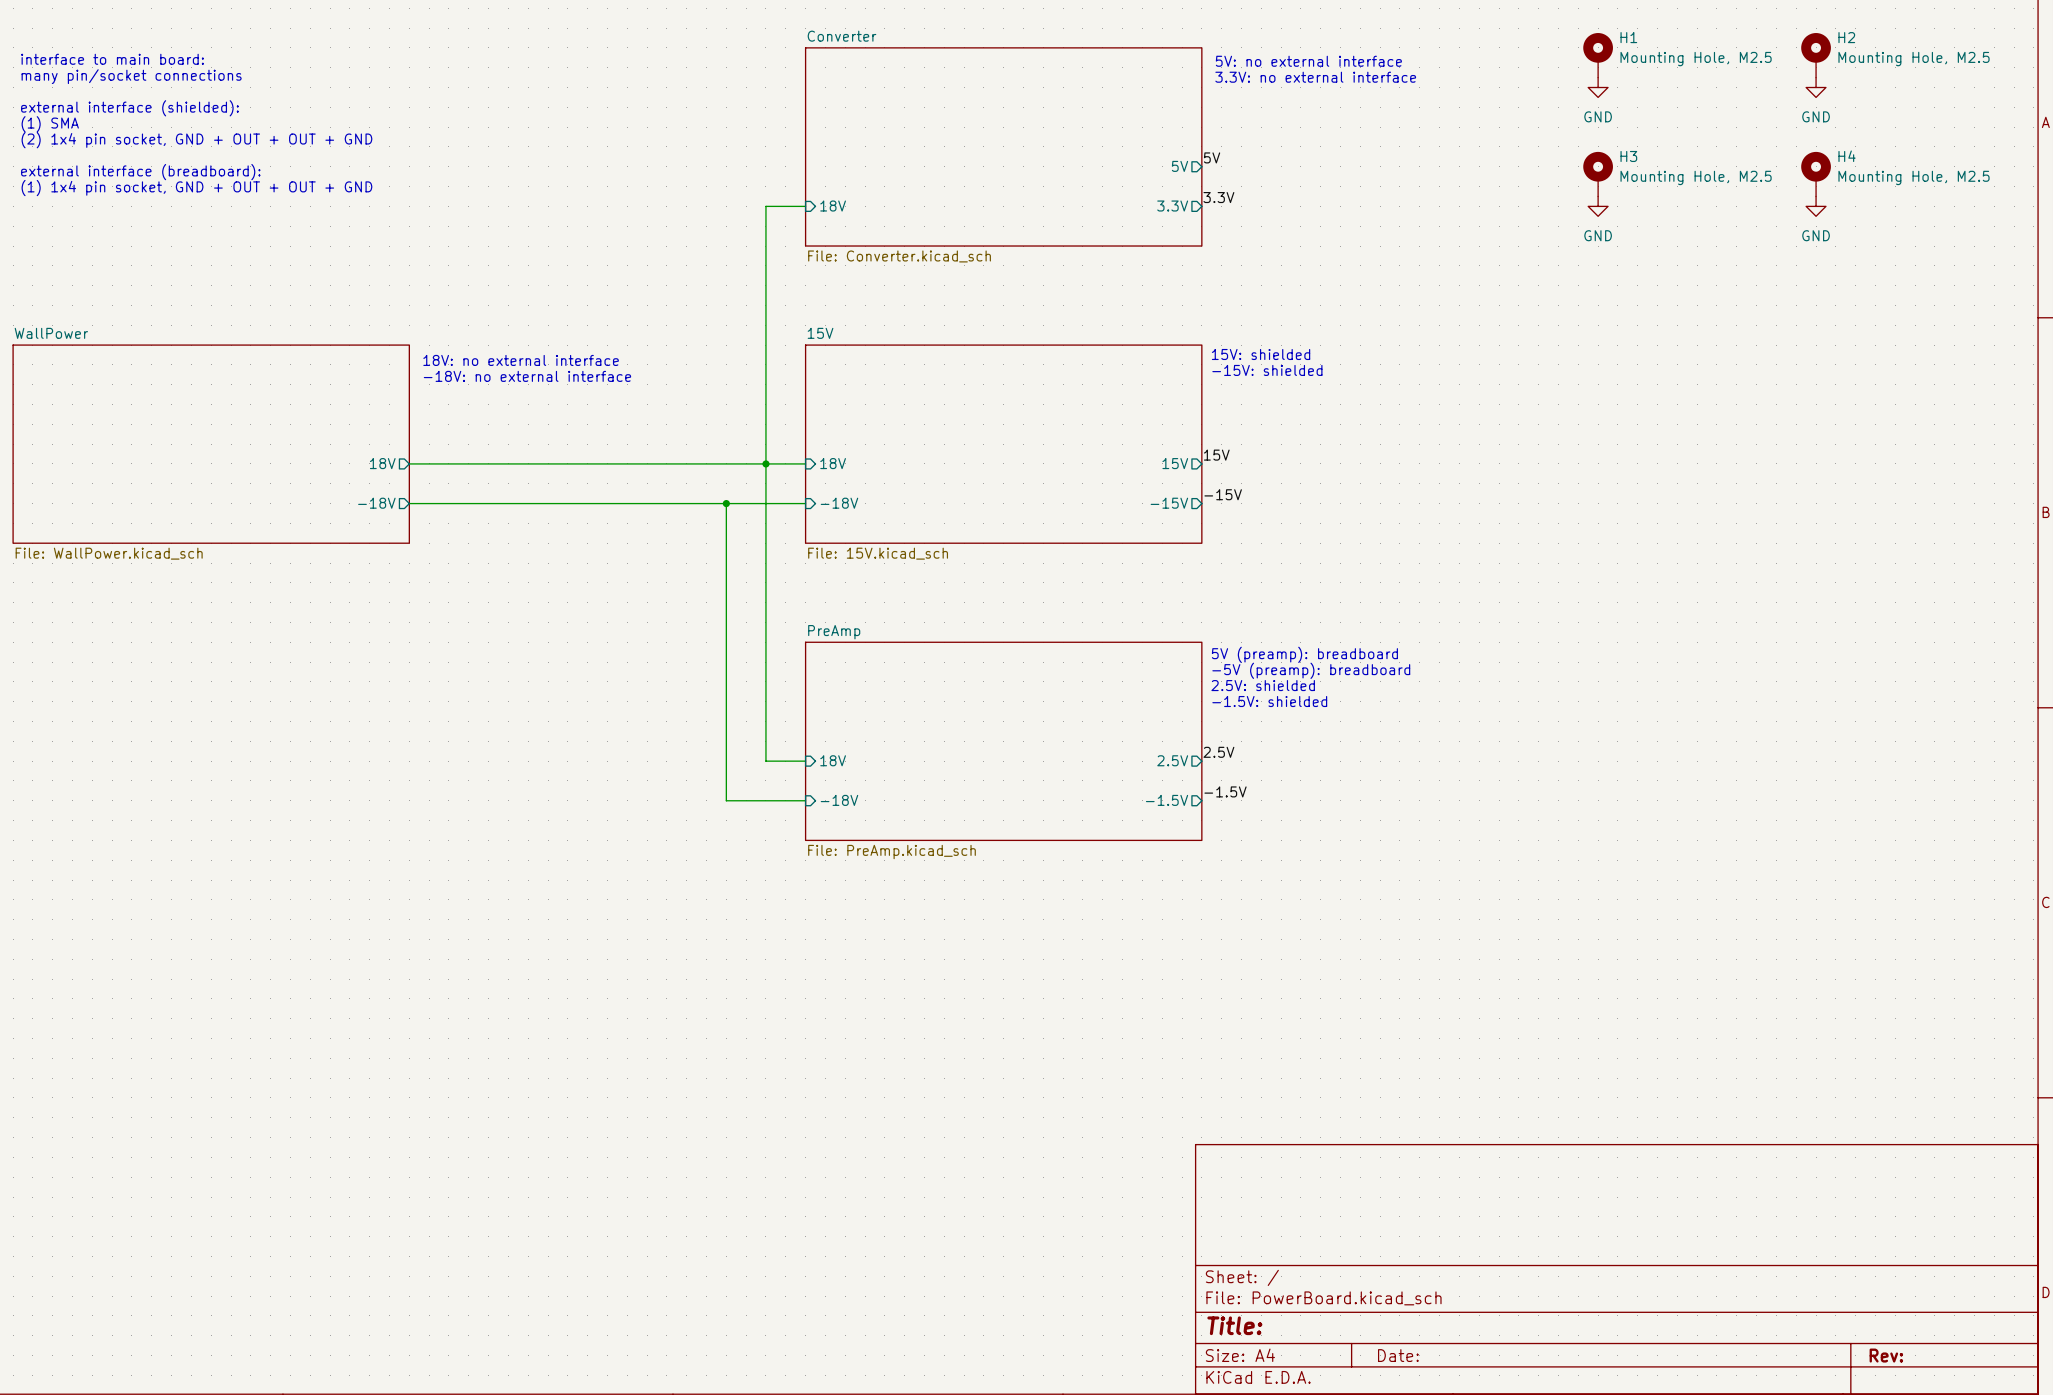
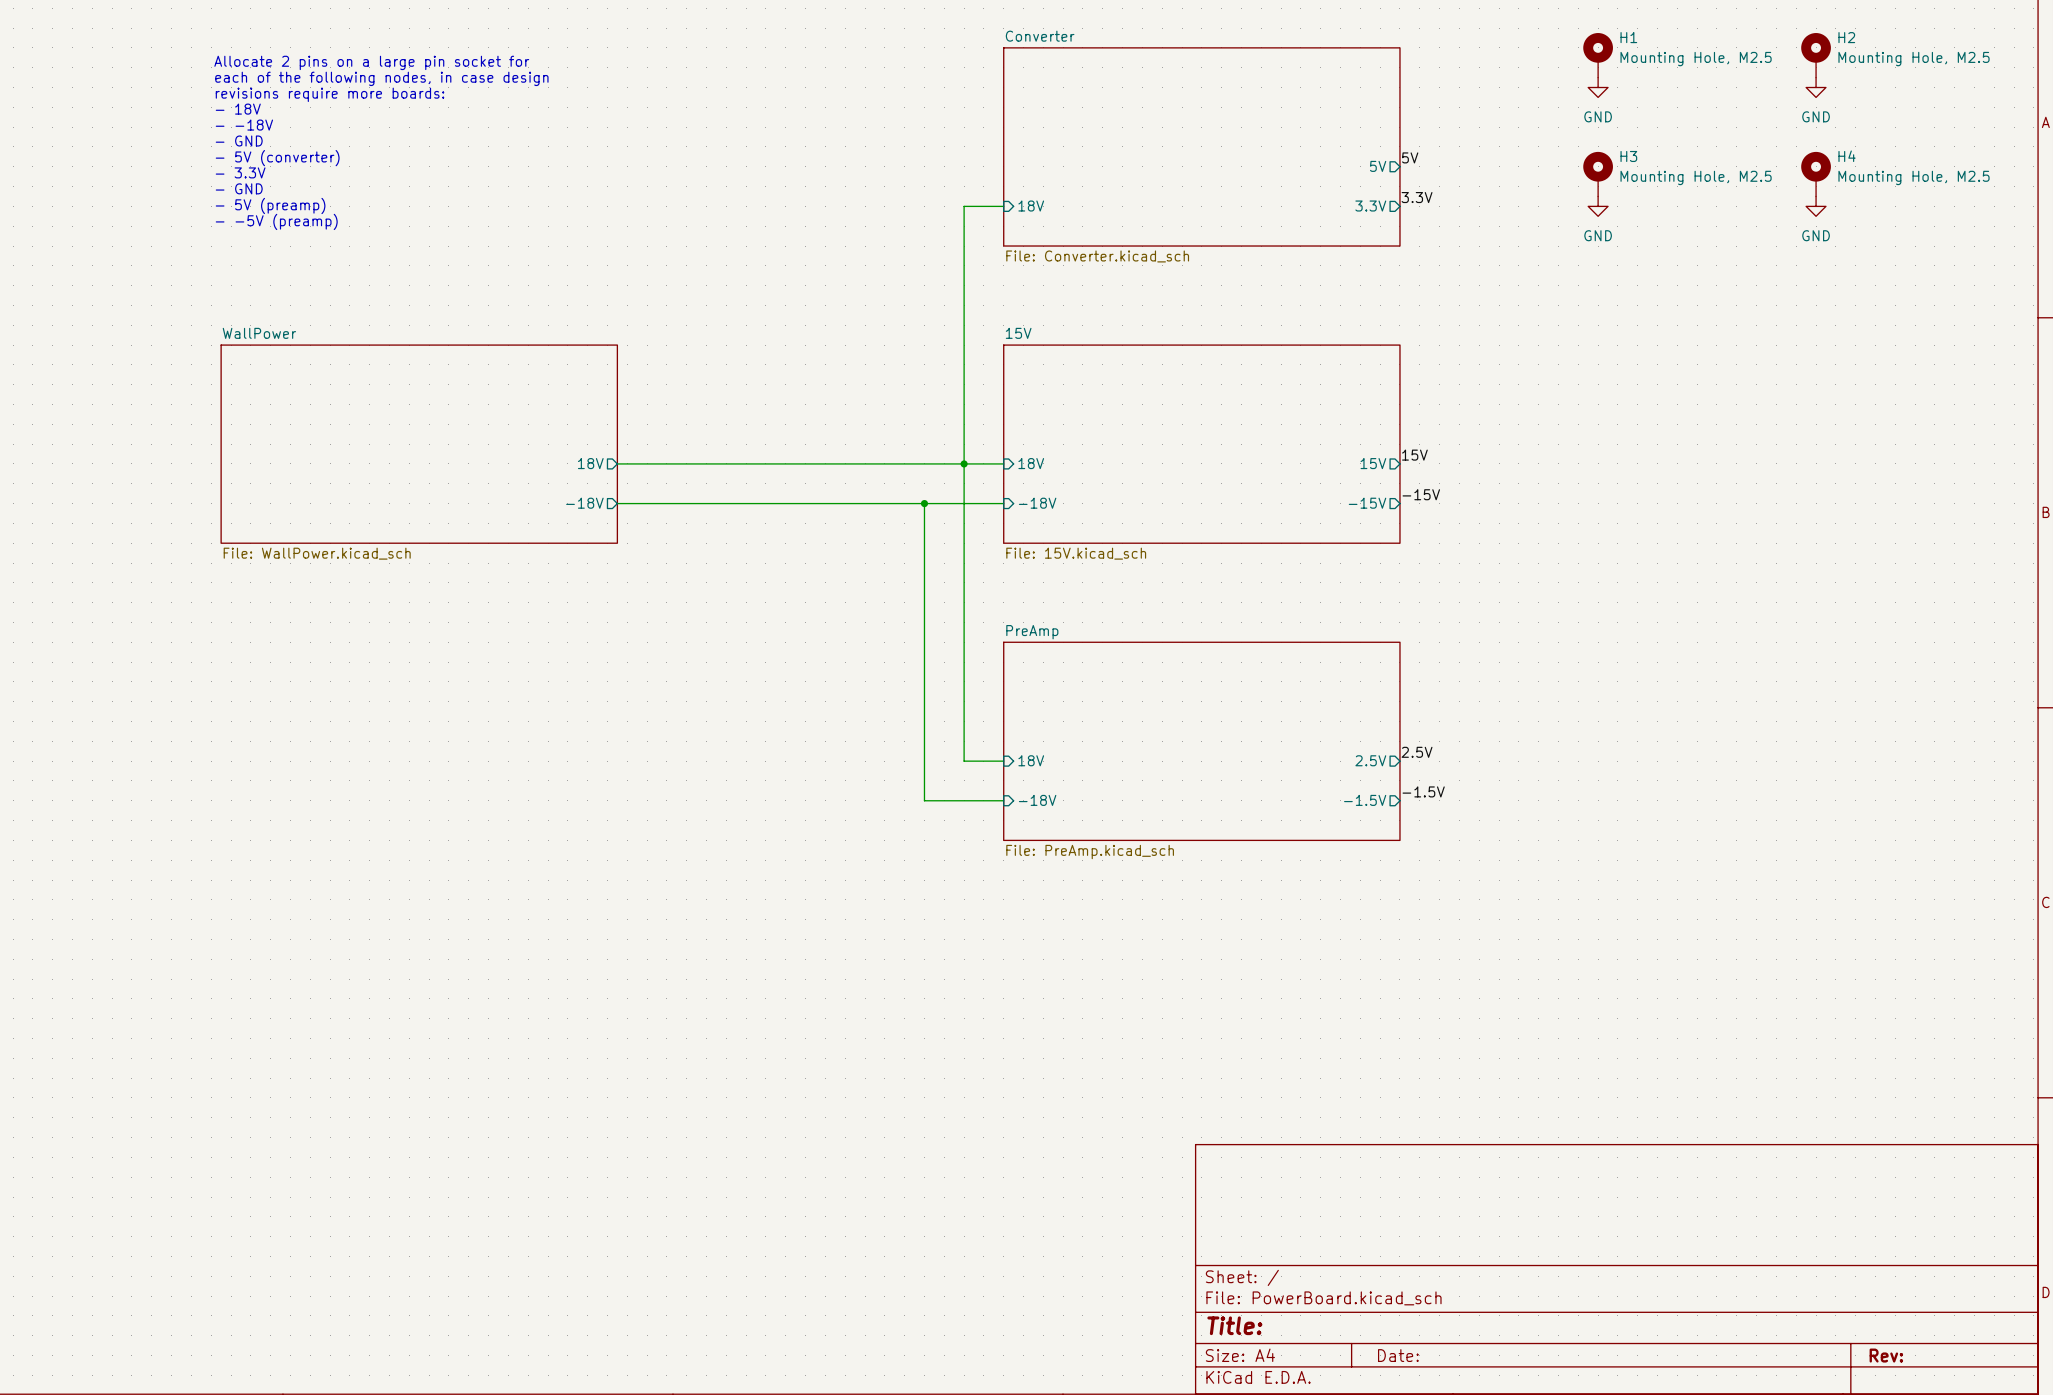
text: interface to main board: (112, 59) -> none
text: 5V: no external interface (1308, 61) -> none
text: none -> Allocate 2 pins on a large pin socket for (371, 62)
text: many pin/socket connections (131, 76) -> none
text: 3.3V: no external interface (1315, 77) -> none
text: none -> each of the following nodes, in case design (381, 78)
text: none -> revisions require more boards: (330, 94)
text: external interface (shielded): (129, 108) -> none
text: none -> - 18V (238, 109)
text: (1) SMA (50, 124) -> none
text: none -> - -18V (244, 125)
text: (2) 1x4 pin socket, GND + OUT + OUT + GND (196, 140) -> none
text: none -> - GND (239, 141)
sheet Converter: File: Converter.kicad_sch (1003, 146) -> none
sheet Converter: none -> File: Converter.kicad_sch (1201, 146)
label: 5V (1212, 157) -> none
label: none -> 5V (1410, 157)
text: none -> - 5V (converter) (277, 158)
sheet pin: 5V (1179, 166) -> none
sheet pin: none -> 5V (1378, 166)
text: external interface (breadboard): (140, 172) -> none
text: none -> - 3.3V (240, 172)
text: (1) 1x4 pin socket, GND + OUT + OUT + GND (196, 188) -> none
text: none -> - GND (239, 188)
label: 3.3V (1218, 197) -> none
label: none -> 3.3V (1417, 197)
text: none -> - 5V (preamp) (270, 205)
wire: (805, 206) (765, 206) (765, 761) (805, 761) -> none
sheet pin: 18V (833, 206) -> none
wire: none -> (1003, 206) (964, 206) (964, 761) (1003, 761)
sheet pin: none -> 18V (1031, 206)
sheet pin: 3.3V (1172, 206) -> none
sheet pin: none -> 3.3V (1370, 206)
text: none -> - -5V (preamp) (276, 221)
text: 15V: shielded (1261, 354) -> none
text: 18V: no external interface (521, 360) -> none
text: -15V: shielded (1267, 370) -> none
text: -18V: no external interface (527, 376) -> none
sheet WallPower: File: WallPower.kicad_sch (211, 444) -> none
sheet WallPower: none -> File: WallPower.kicad_sch (419, 444)
sheet 15V position: (1003, 444) -> (1201, 444)
label: 15V (1216, 455) -> none
label: none -> 15V (1414, 455)
sheet pin: 18V (382, 463) -> none
wire: (409, 463) (617, 463) -> none
sheet pin: none -> 18V (590, 463)
junction: (765, 463) -> none
wire: none -> (805, 463) (1003, 463)
sheet pin: 18V (833, 463) -> none
junction: none -> (964, 463)
sheet pin: none -> 18V (1031, 463)
sheet pin: 15V (1175, 463) -> none
sheet pin: none -> 15V (1373, 463)
label: -15V (1223, 494) -> none
label: none -> -15V (1421, 494)
sheet pin: -18V (376, 503) -> none
wire: (409, 503) (617, 503) -> none
sheet pin: none -> -18V (584, 503)
wire: (726, 503) (726, 800) (805, 800) -> none
junction: (726, 503) -> none
wire: none -> (805, 503) (1003, 503)
sheet pin: -18V (839, 503) -> none
wire: none -> (924, 503) (924, 800) (1003, 800)
junction: none -> (924, 503)
sheet pin: none -> -18V (1037, 503)
sheet pin: -15V (1169, 503) -> none
sheet pin: none -> -15V (1367, 503)
text: 5V (preamp): breadboard (1304, 654) -> none
text: -5V (preamp): breadboard (1311, 670) -> none
text: 2.5V: shielded (1263, 685) -> none
text: -1.5V: shielded (1269, 701) -> none
sheet PreAmp: File: PreAmp.kicad_sch (1003, 741) -> none
sheet PreAmp: none -> File: PreAmp.kicad_sch (1201, 741)
label: 2.5V (1218, 752) -> none
label: none -> 2.5V (1417, 752)
sheet pin: 18V (833, 760) -> none
sheet pin: none -> 18V (1031, 760)
sheet pin: 2.5V (1172, 760) -> none
sheet pin: none -> 2.5V (1370, 760)
label: -1.5V (1225, 791) -> none
label: none -> -1.5V (1423, 791)
sheet pin: -18V (839, 800) -> none
sheet pin: none -> -18V (1037, 800)
sheet pin: -1.5V (1167, 800) -> none
sheet pin: none -> -1.5V (1365, 800)

